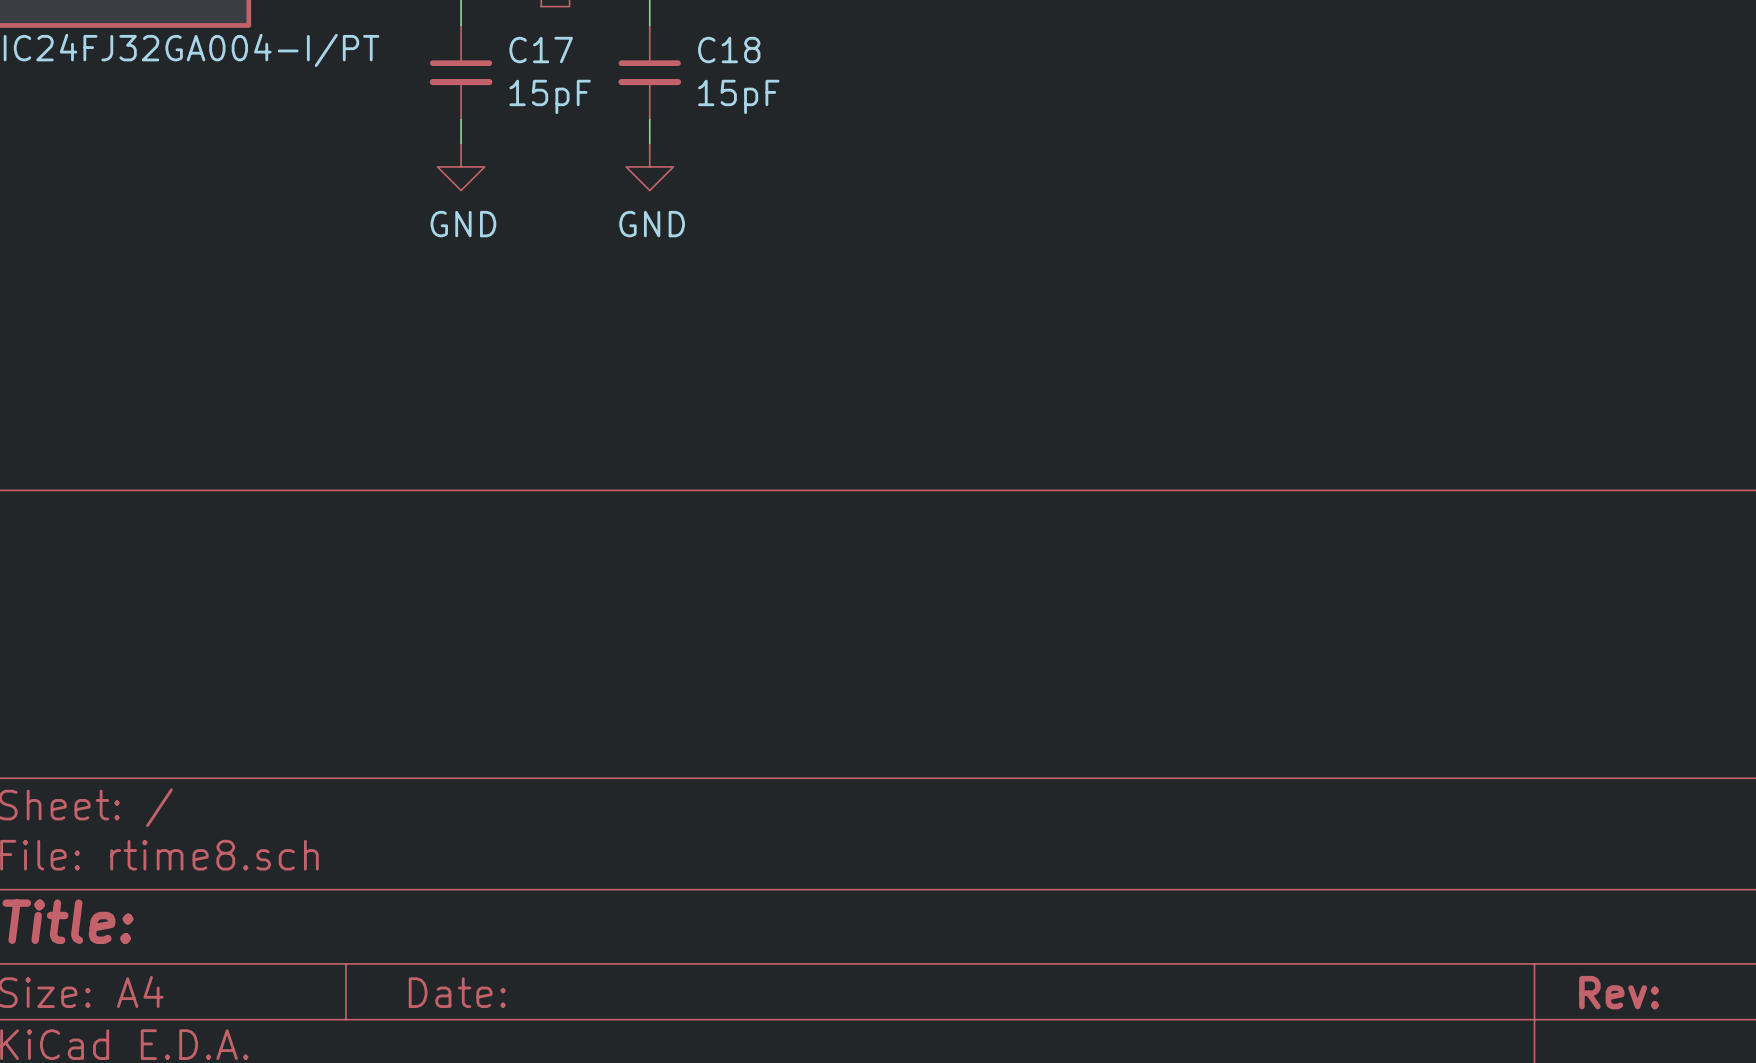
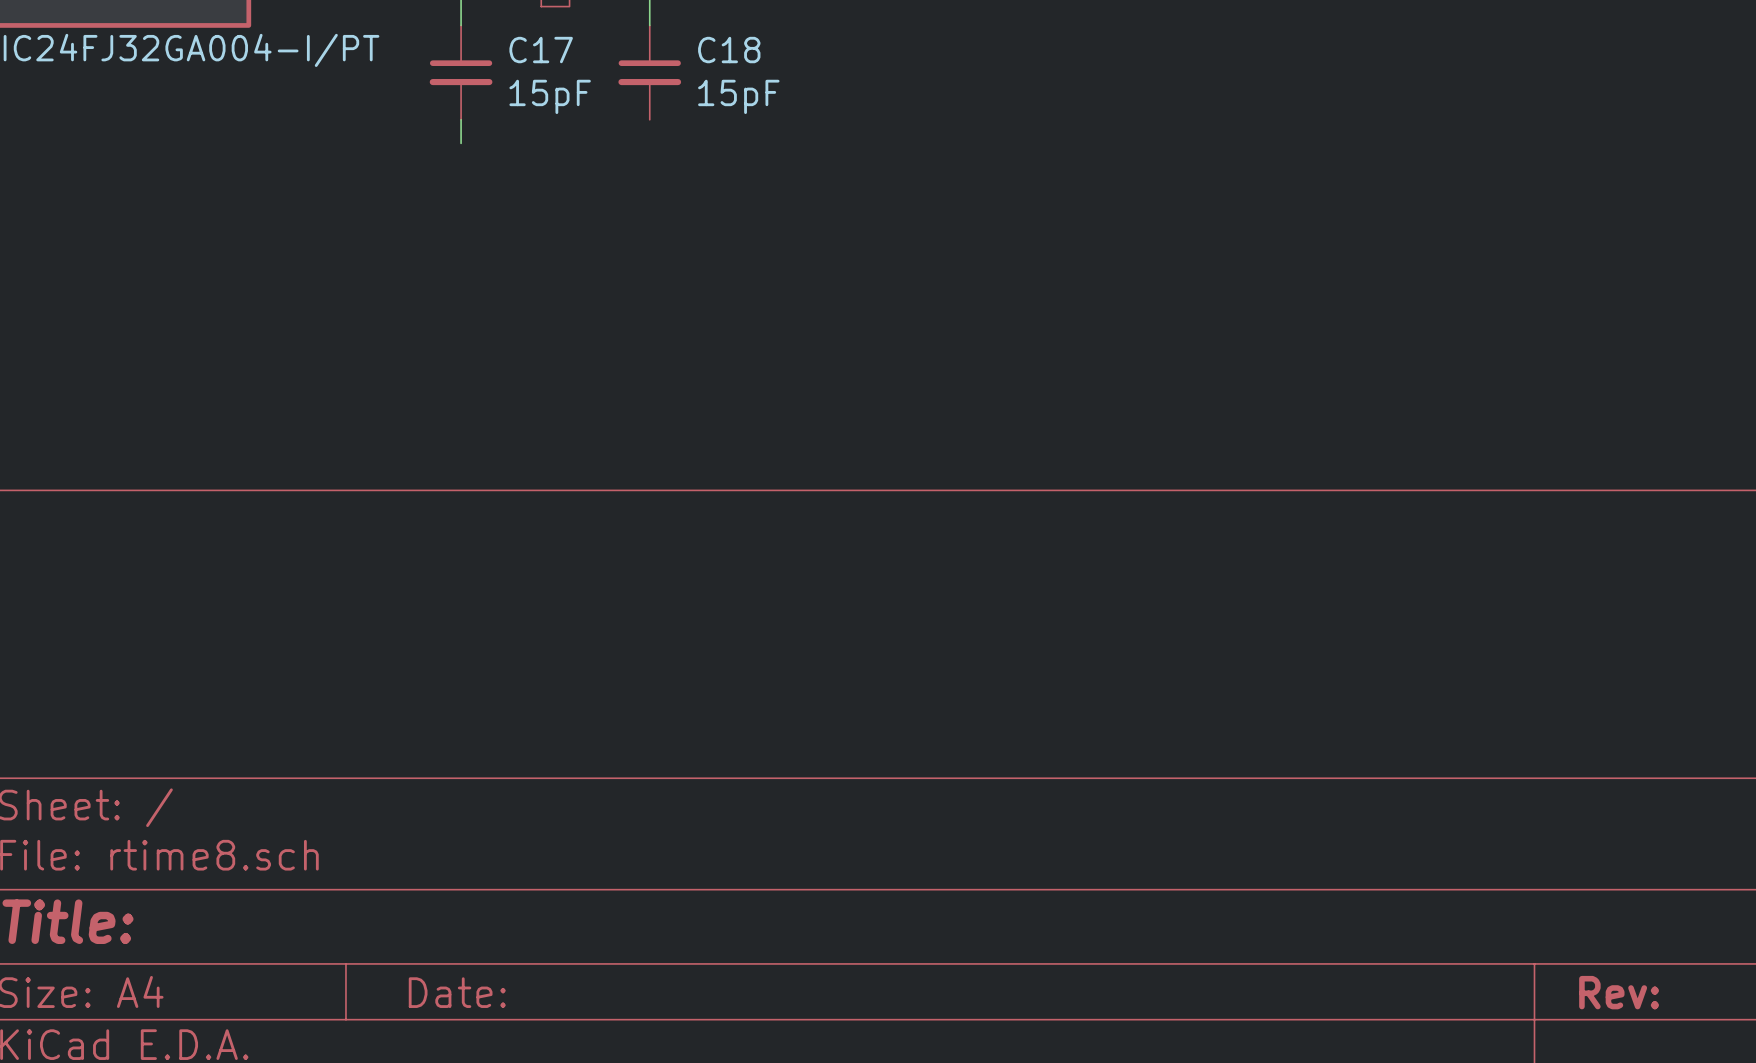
wire: (649, 119) (649, 143) -> none
power symbol: GND (461, 166) -> none
power symbol: GND (649, 166) -> none

